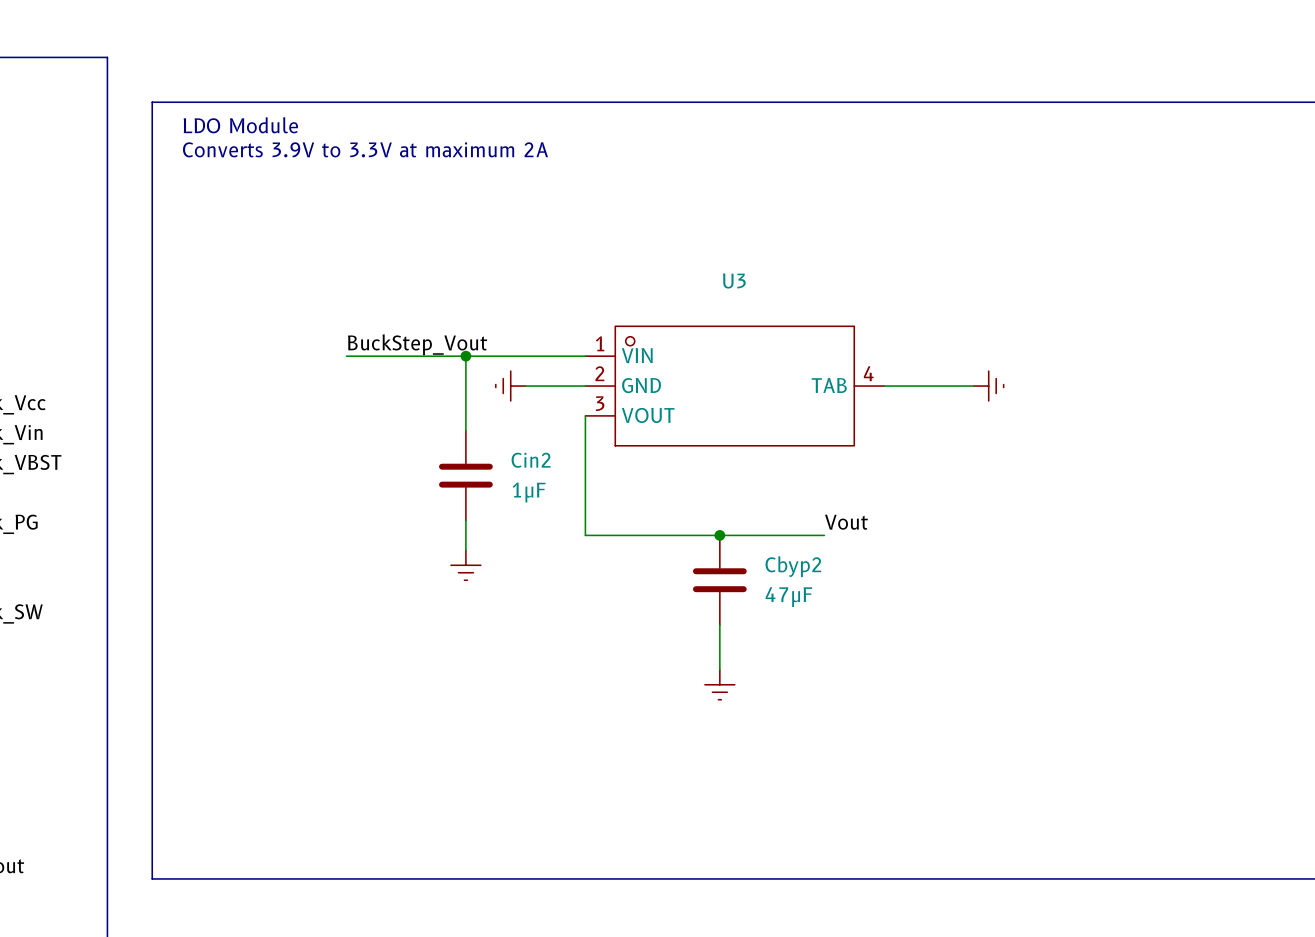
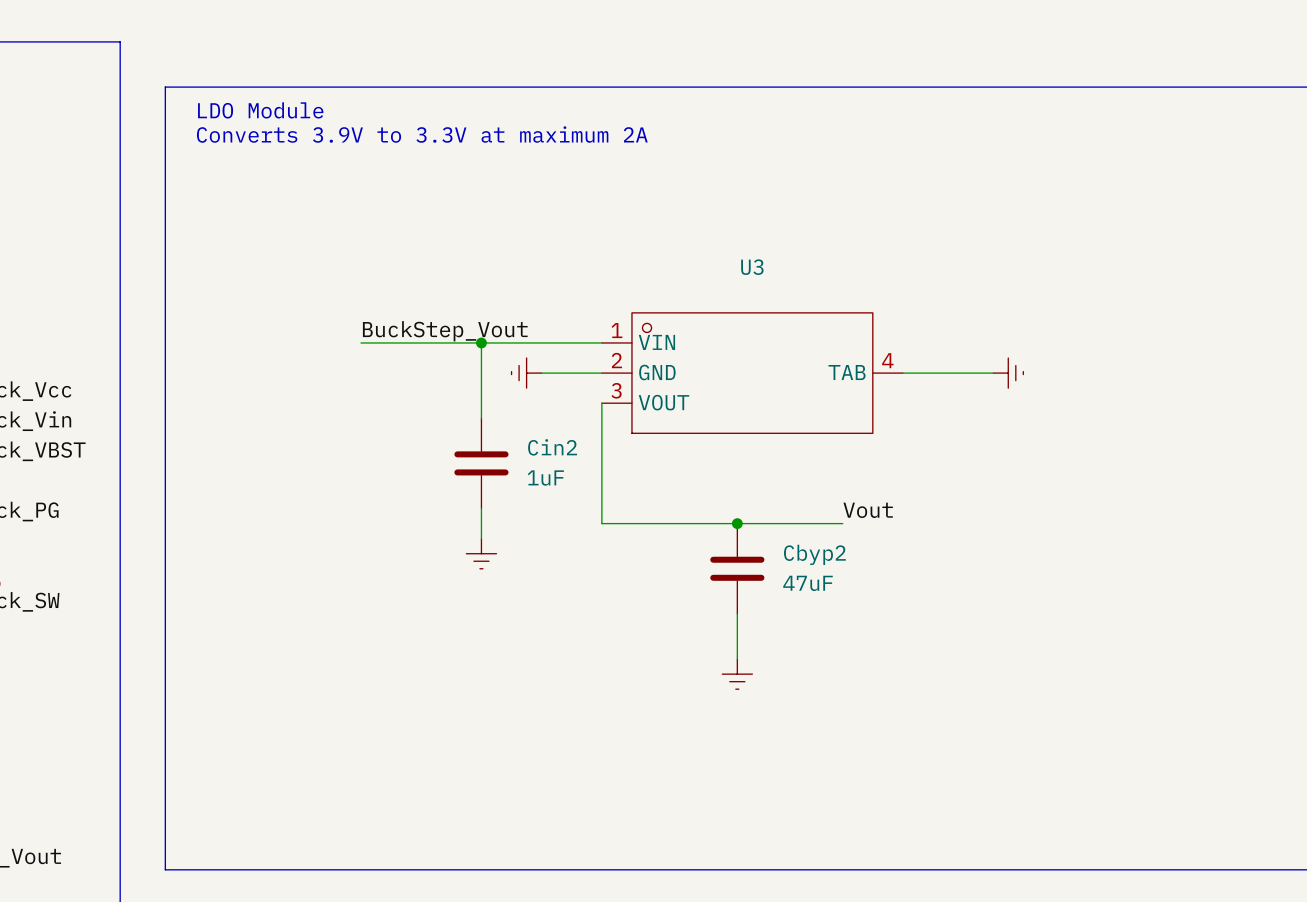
Cin2 value: 1μF (529, 492) -> 1uF (545, 478)
Cbyp2 value: 47μF (788, 597) -> 47uF (807, 583)

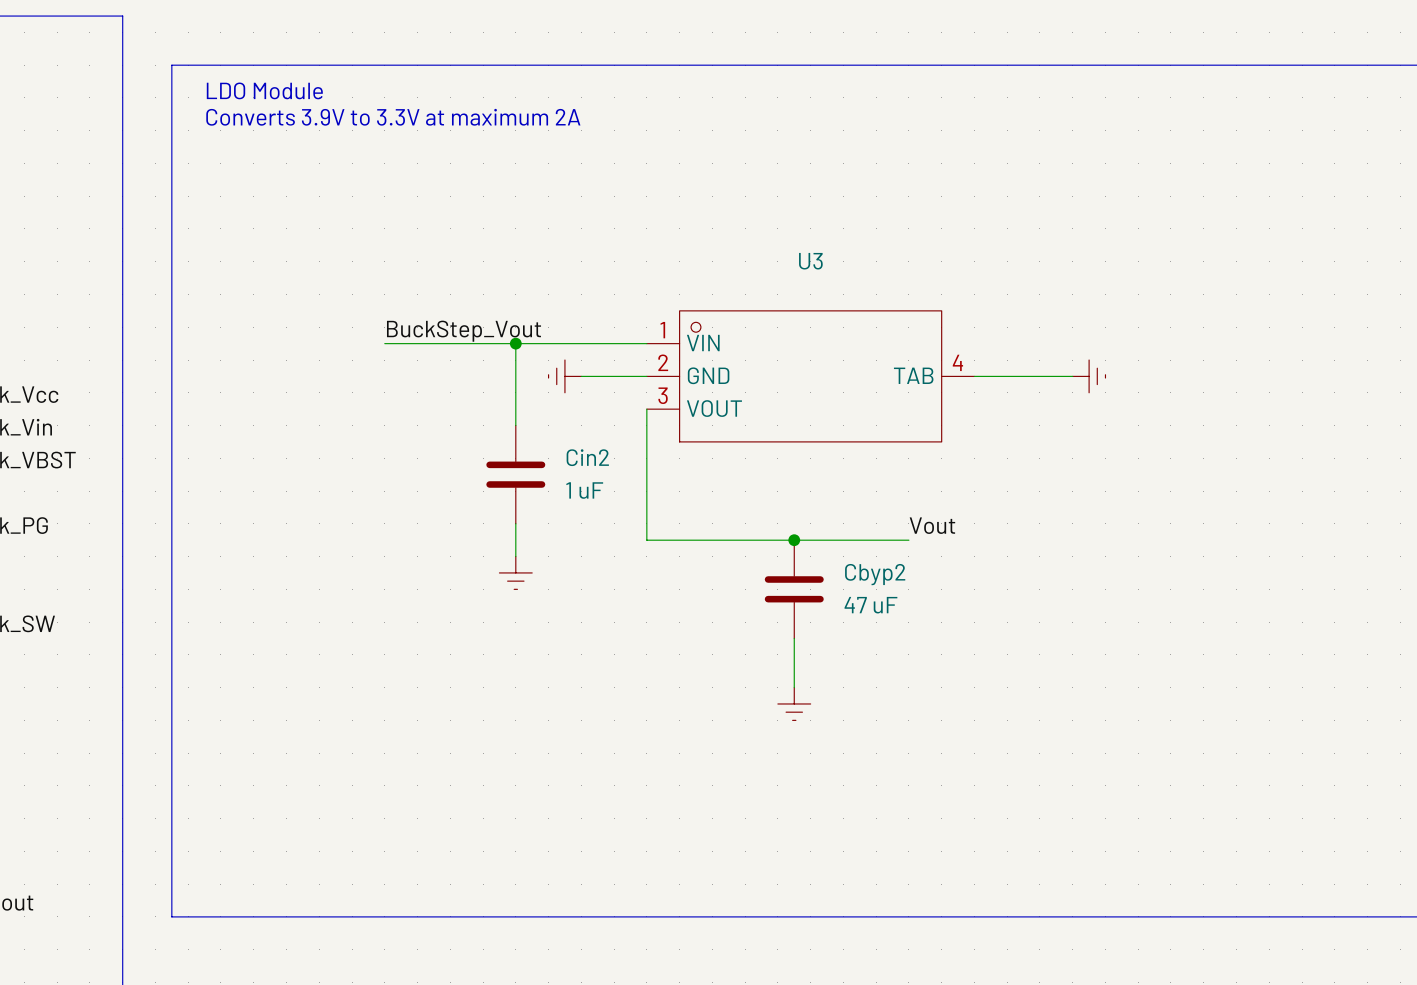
Cin2 value: 1uF (545, 478) -> 1 uF (584, 490)
Cbyp2 value: 47uF (807, 583) -> 47 uF (870, 605)

